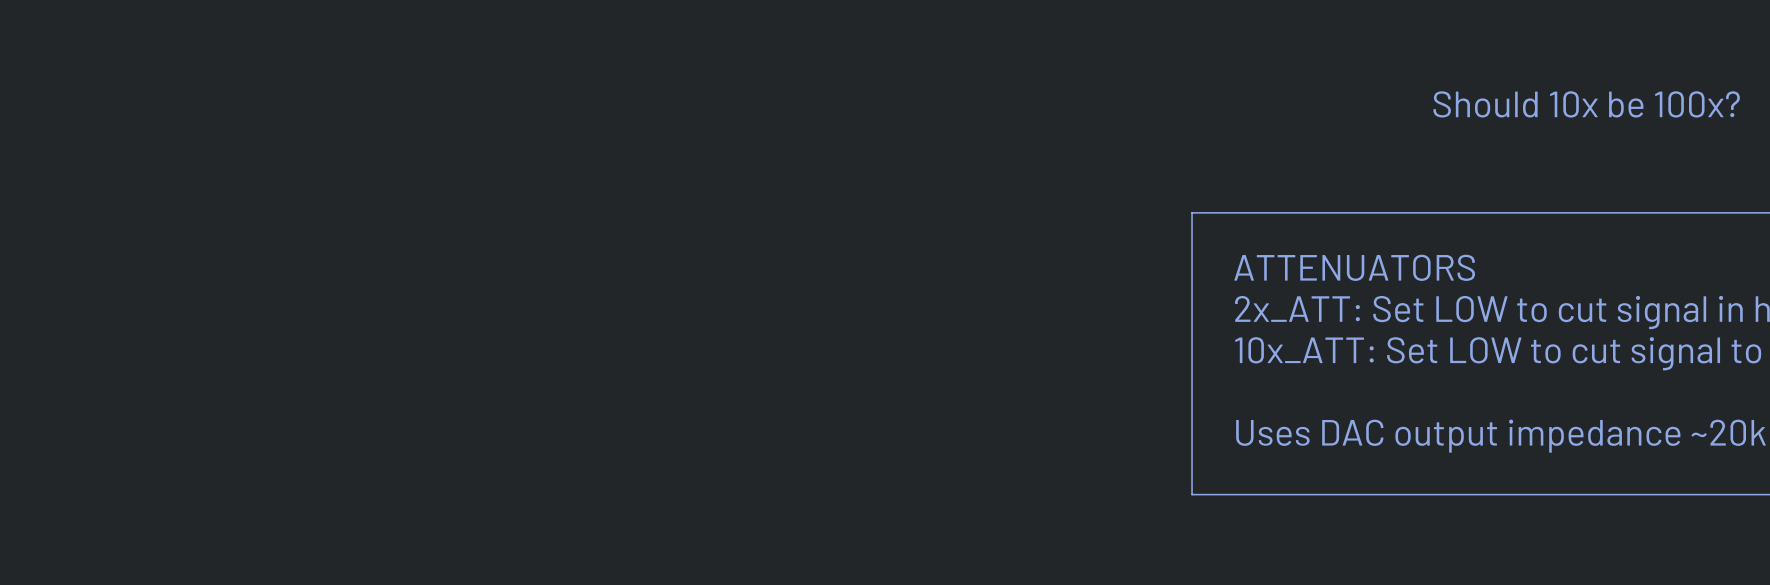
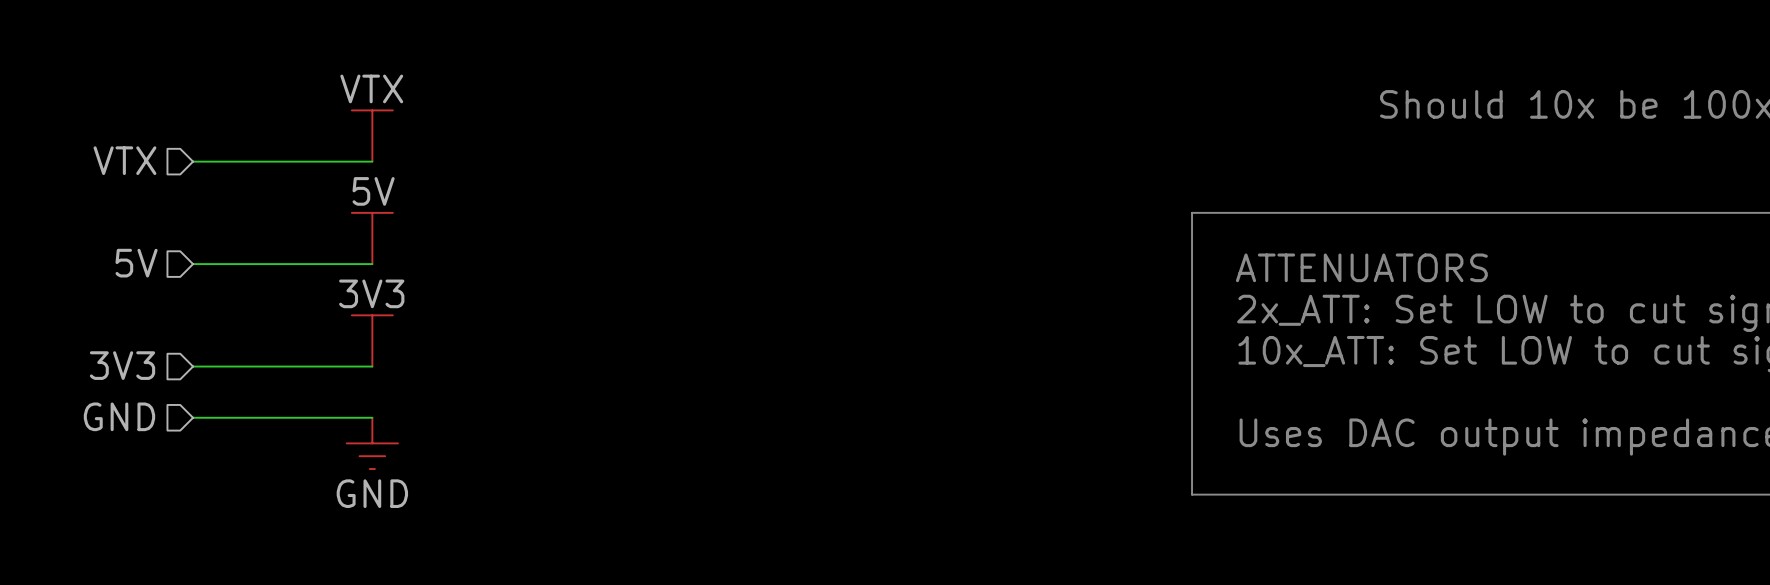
power symbol: none -> VTX (372, 136)
hierarchical label: none -> VTX (124, 160)
wire: none -> (193, 161) (372, 161)
power symbol: none -> 5V (372, 238)
hierarchical label: none -> 5V (136, 263)
wire: none -> (193, 264) (372, 264)
power symbol: none -> 3V3 (372, 340)
hierarchical label: none -> 3V3 (122, 365)
wire: none -> (193, 366) (372, 366)
hierarchical label: none -> GND (119, 416)
wire: none -> (193, 417) (372, 417)
power symbol: none -> GND (372, 443)

